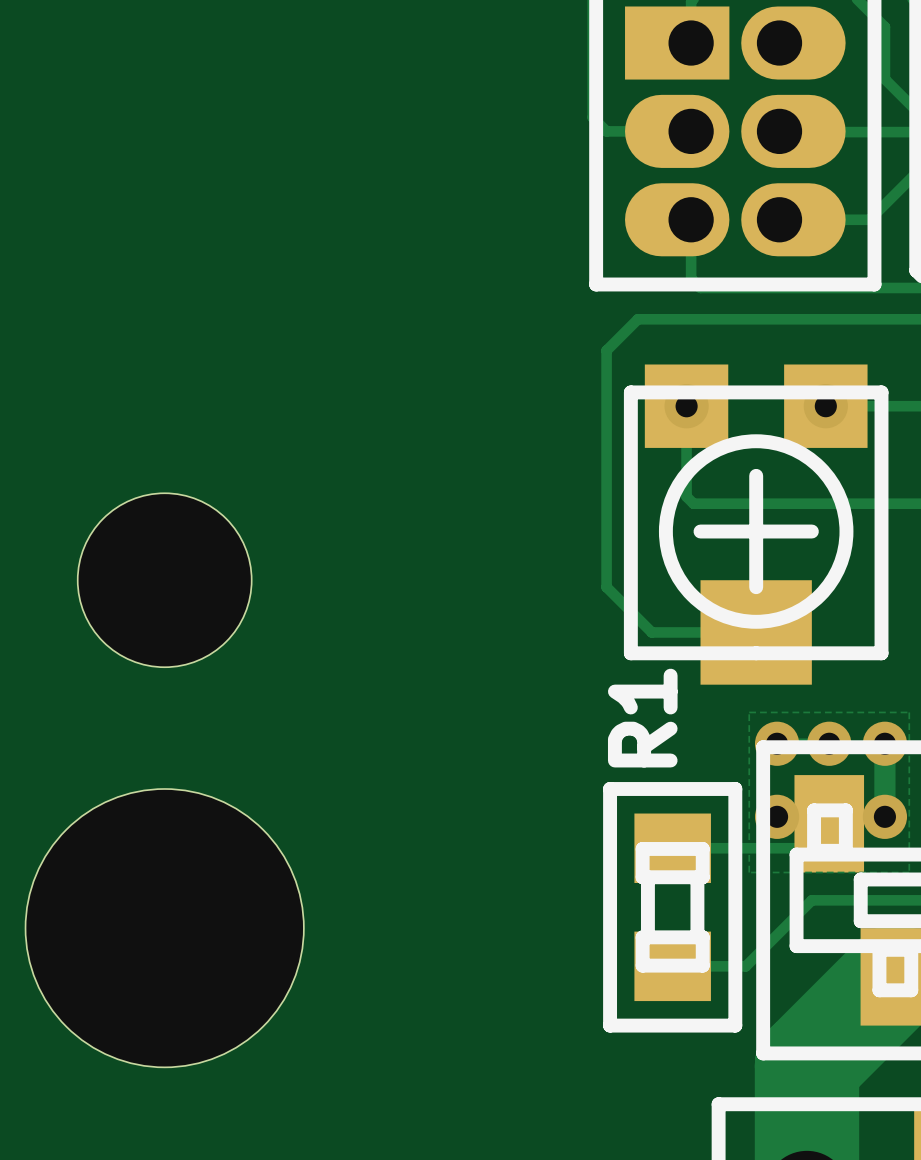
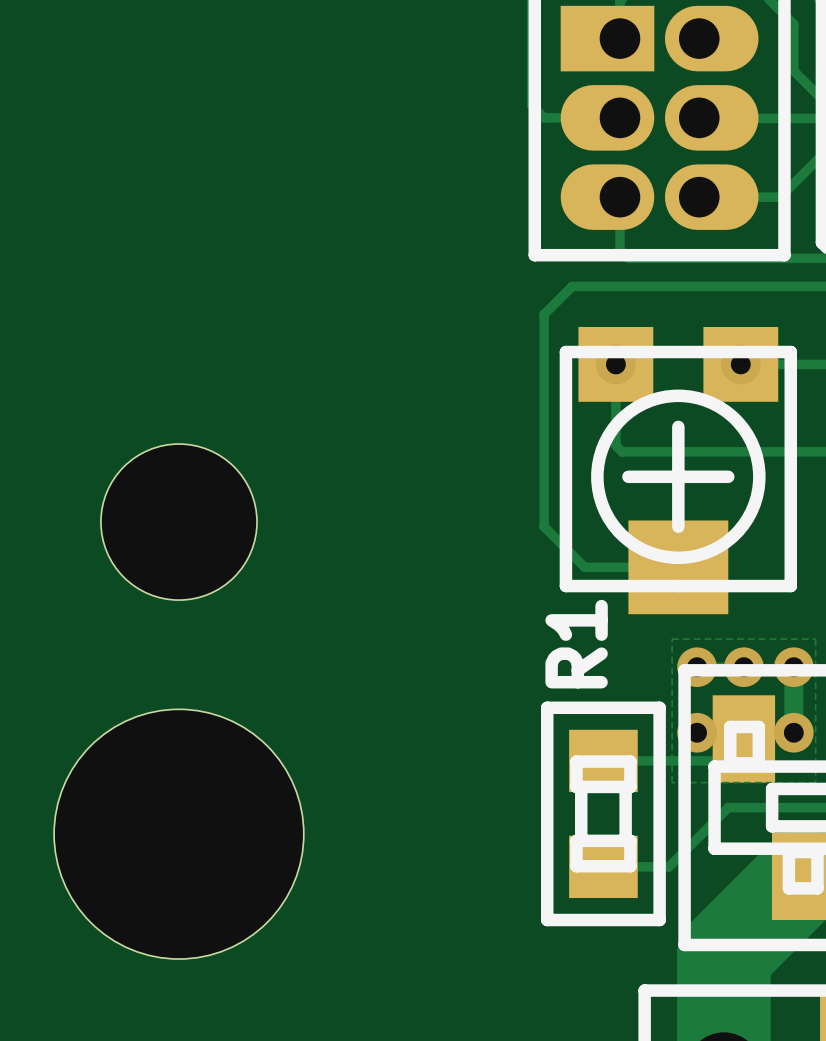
part position: (164, 580) -> (178, 522)
part position: (164, 928) -> (178, 834)

